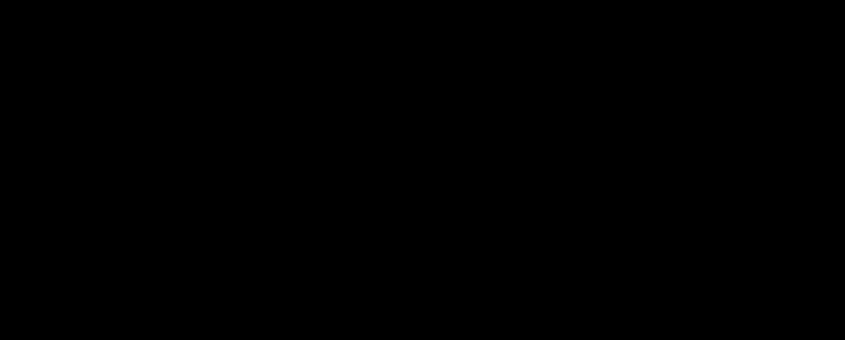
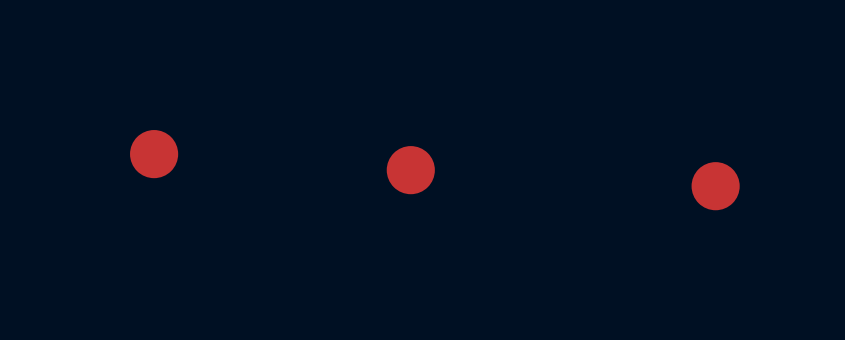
part: none -> (154, 154)
part: none -> (410, 170)
part: none -> (715, 186)

